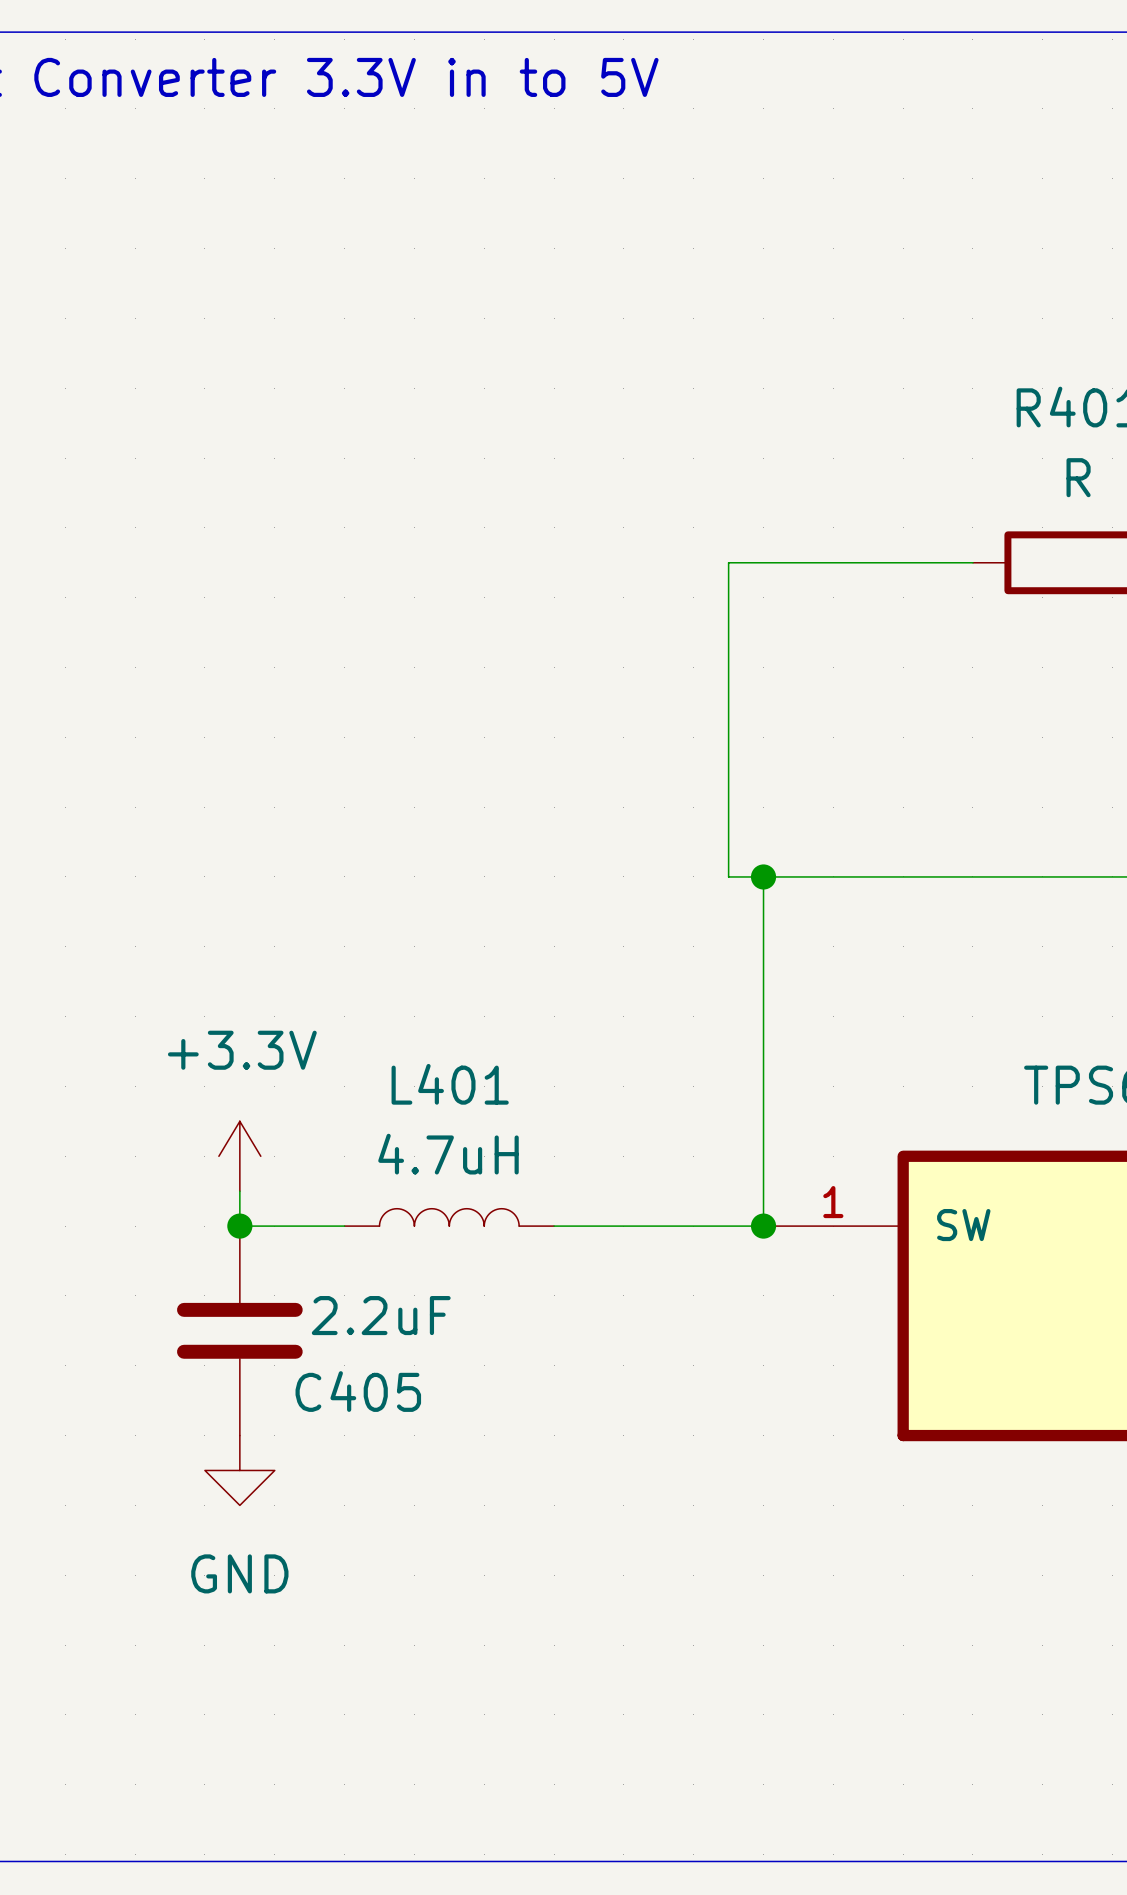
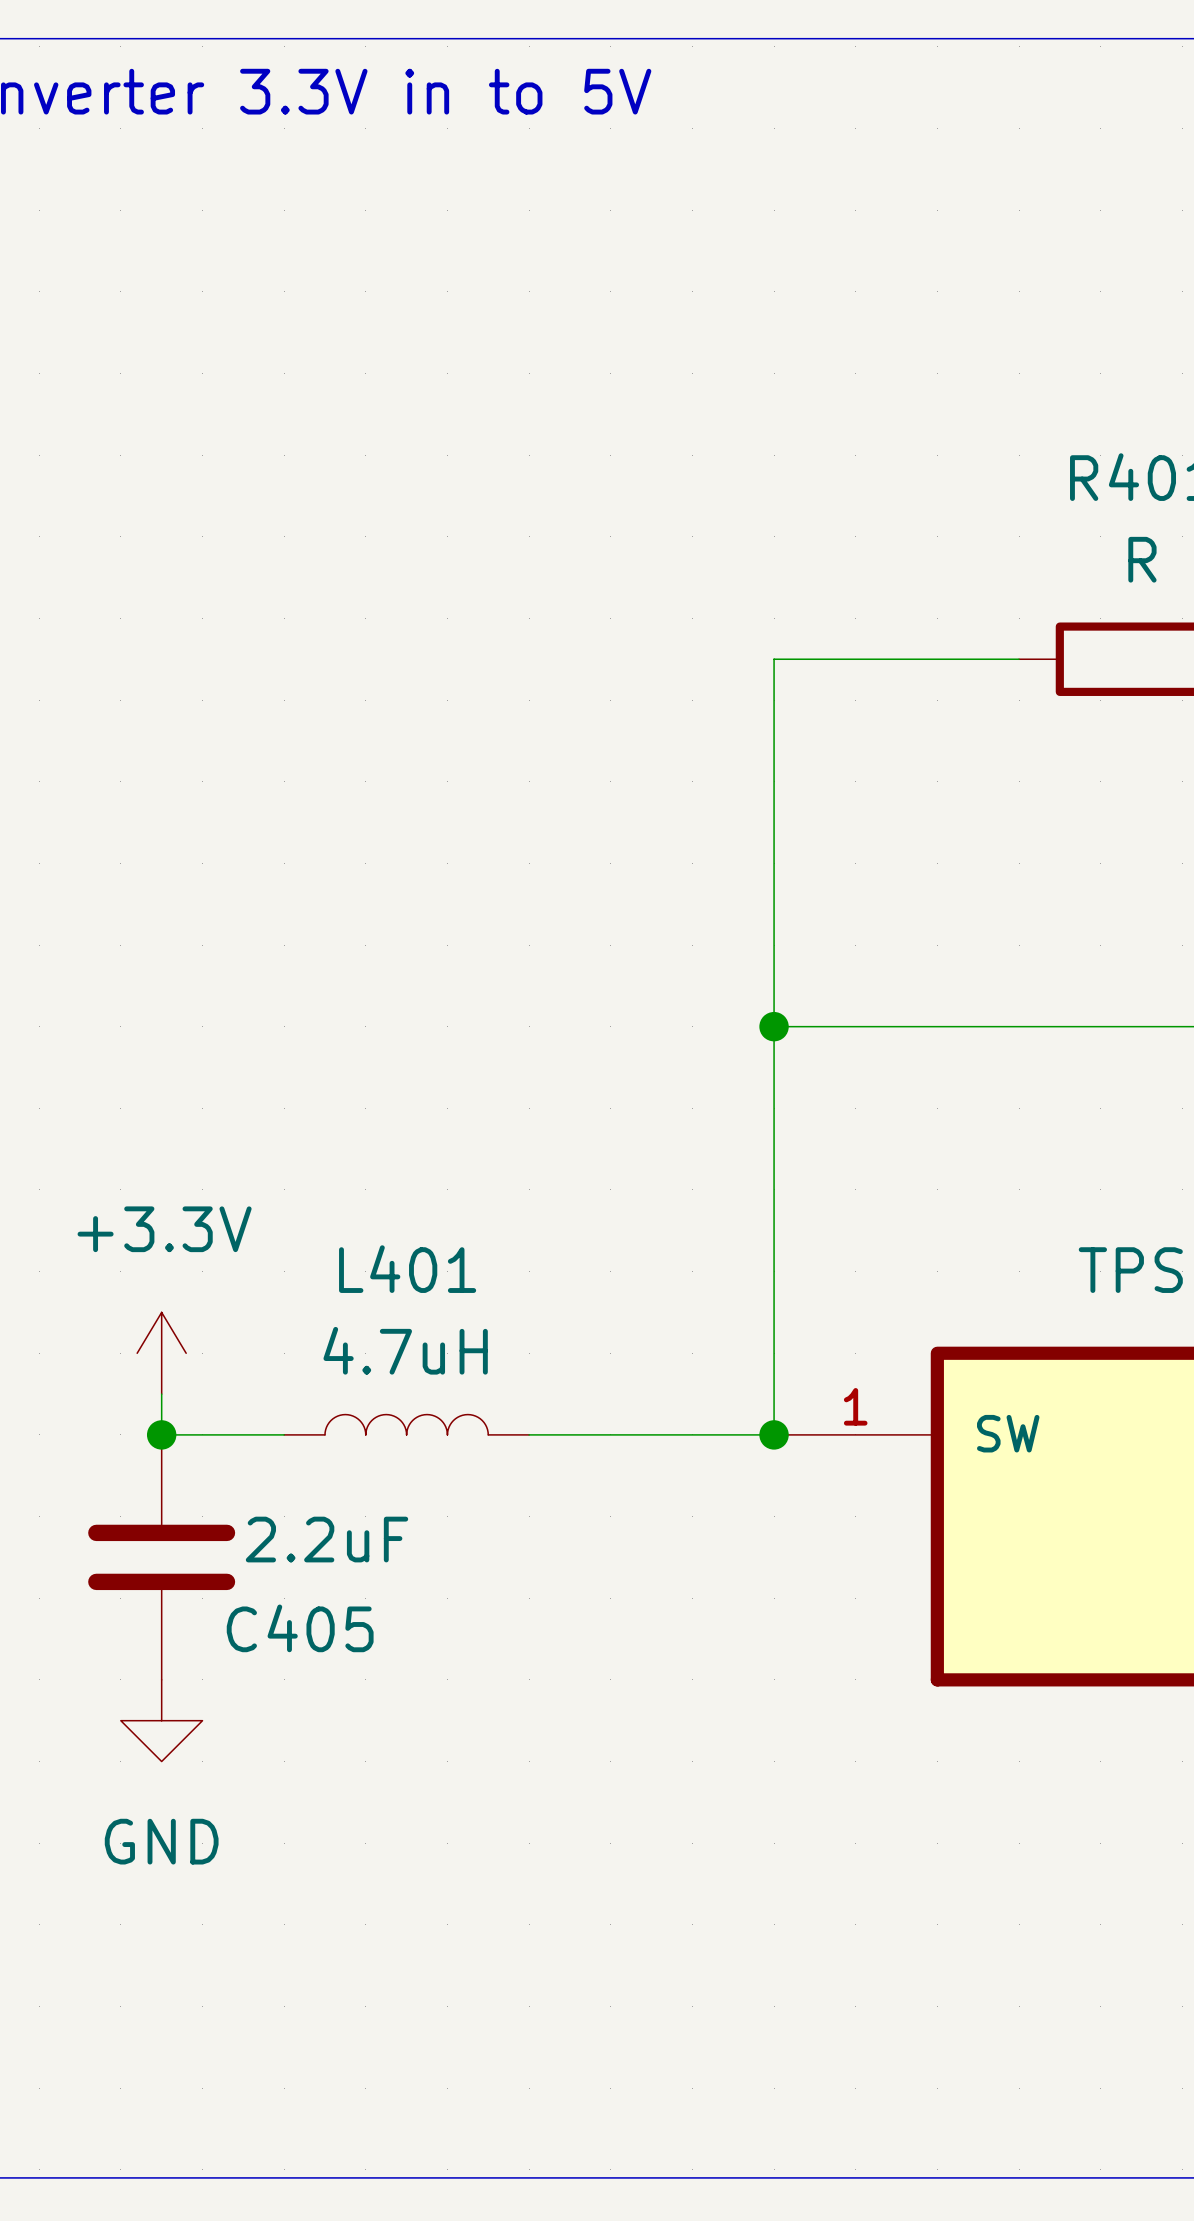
wire: (763, 562) (728, 562) (728, 876) (763, 876) -> (774, 659) (774, 1026)

